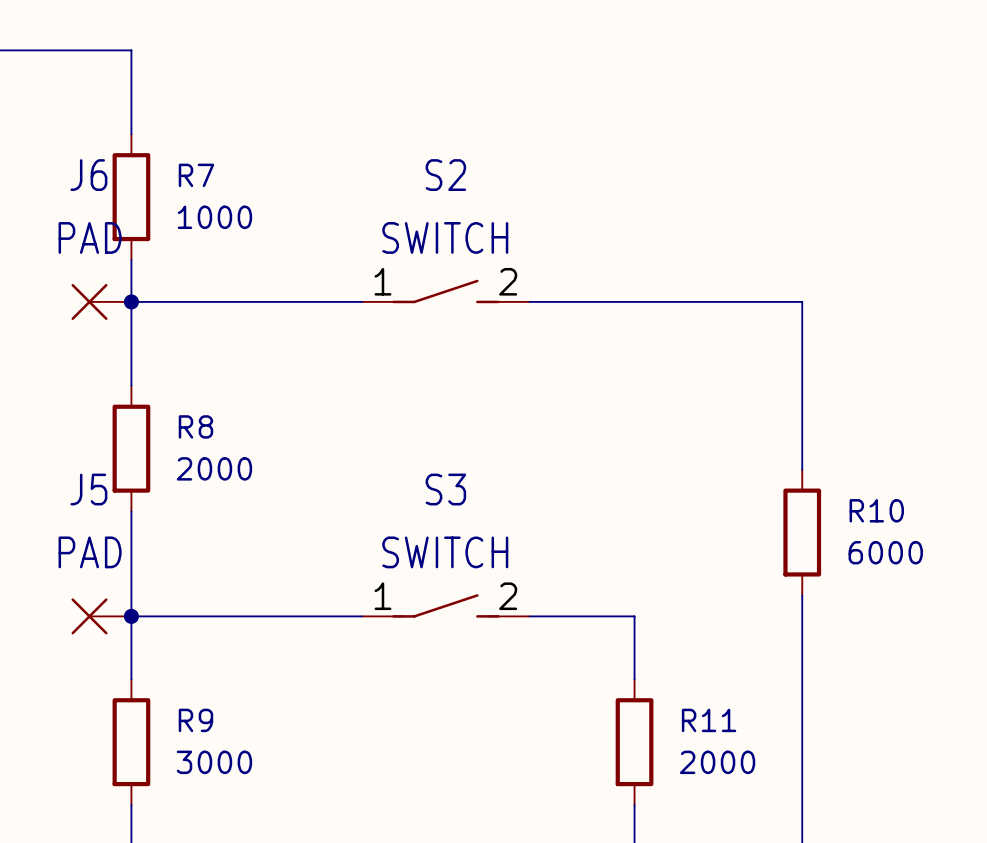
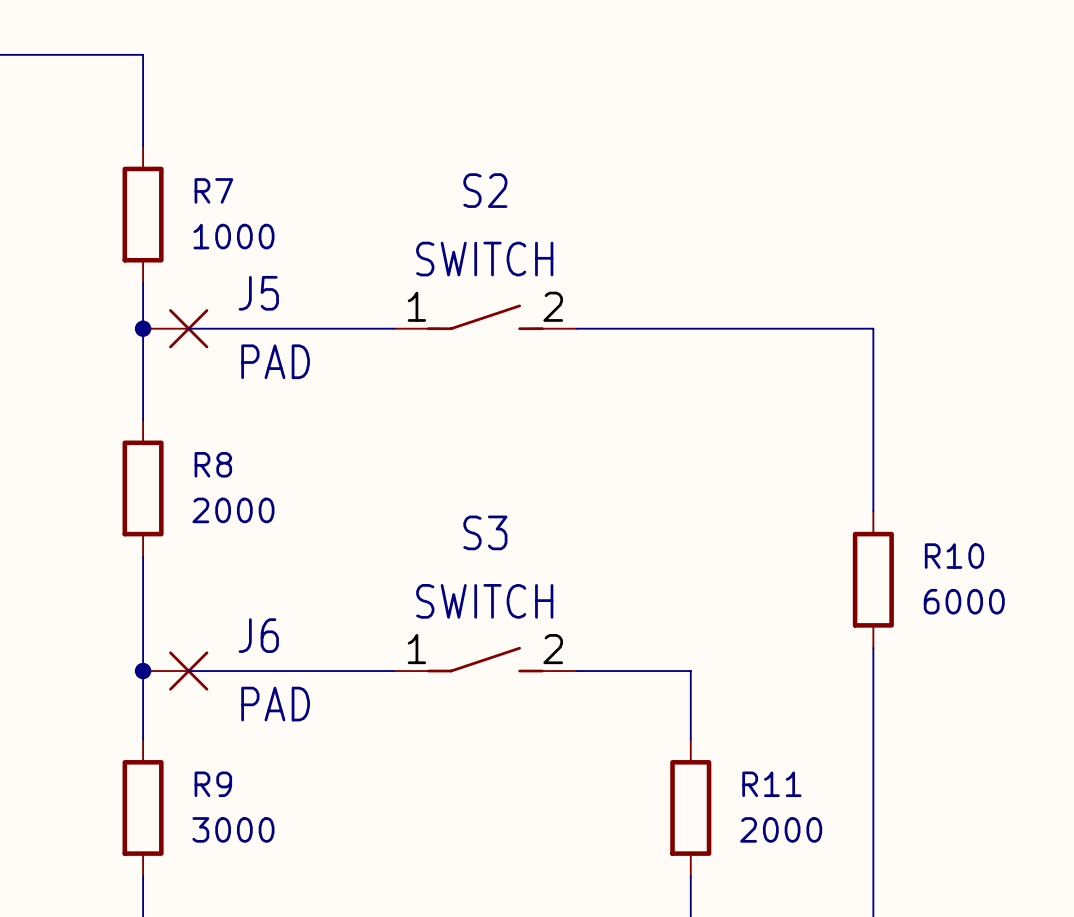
J6 name position: J6 (88, 175) -> J6 (258, 635)
J6 value position: PAD (90, 237) -> PAD (275, 704)
J6 rotation: 0° (89, 301) -> 180° (188, 671)
J6 position: (101, 301) -> (175, 671)
J5 name position: J5 (88, 489) -> J5 (258, 293)
J5 value position: PAD (90, 552) -> PAD (275, 361)
J5 rotation: 0° (89, 616) -> 180° (188, 328)
J5 position: (101, 616) -> (175, 328)

